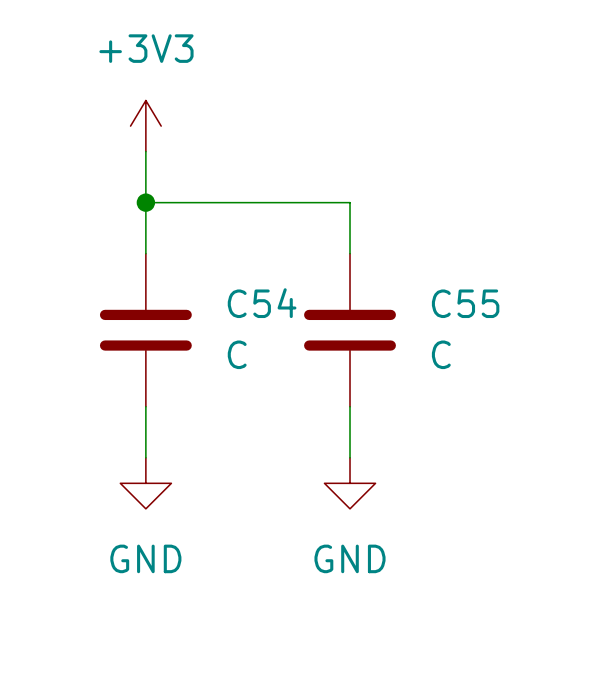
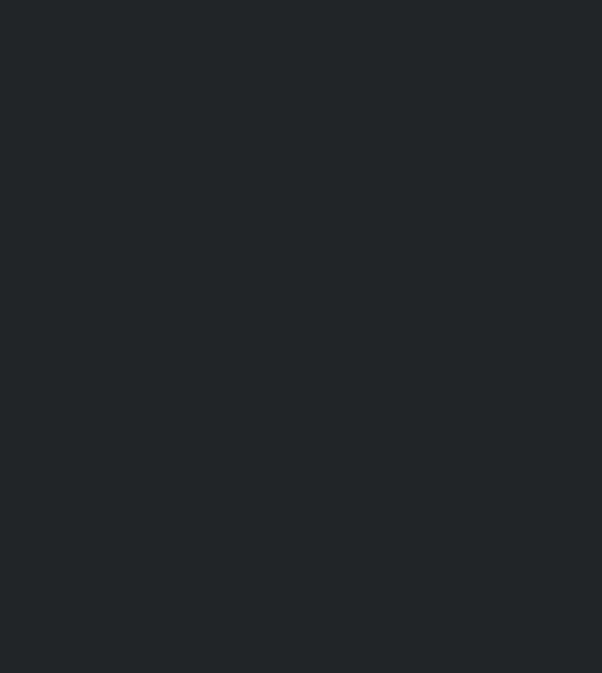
power symbol: +3V3 (145, 126) -> none
wire: (145, 151) (145, 253) -> none
wire: (145, 202) (350, 202) (350, 253) -> none
junction: (145, 202) -> none
C54: C (145, 330) -> none
C55: C (350, 330) -> none
wire: (145, 406) (145, 457) -> none
wire: (350, 406) (350, 457) -> none
power symbol: GND (145, 483) -> none
power symbol: GND (350, 483) -> none

